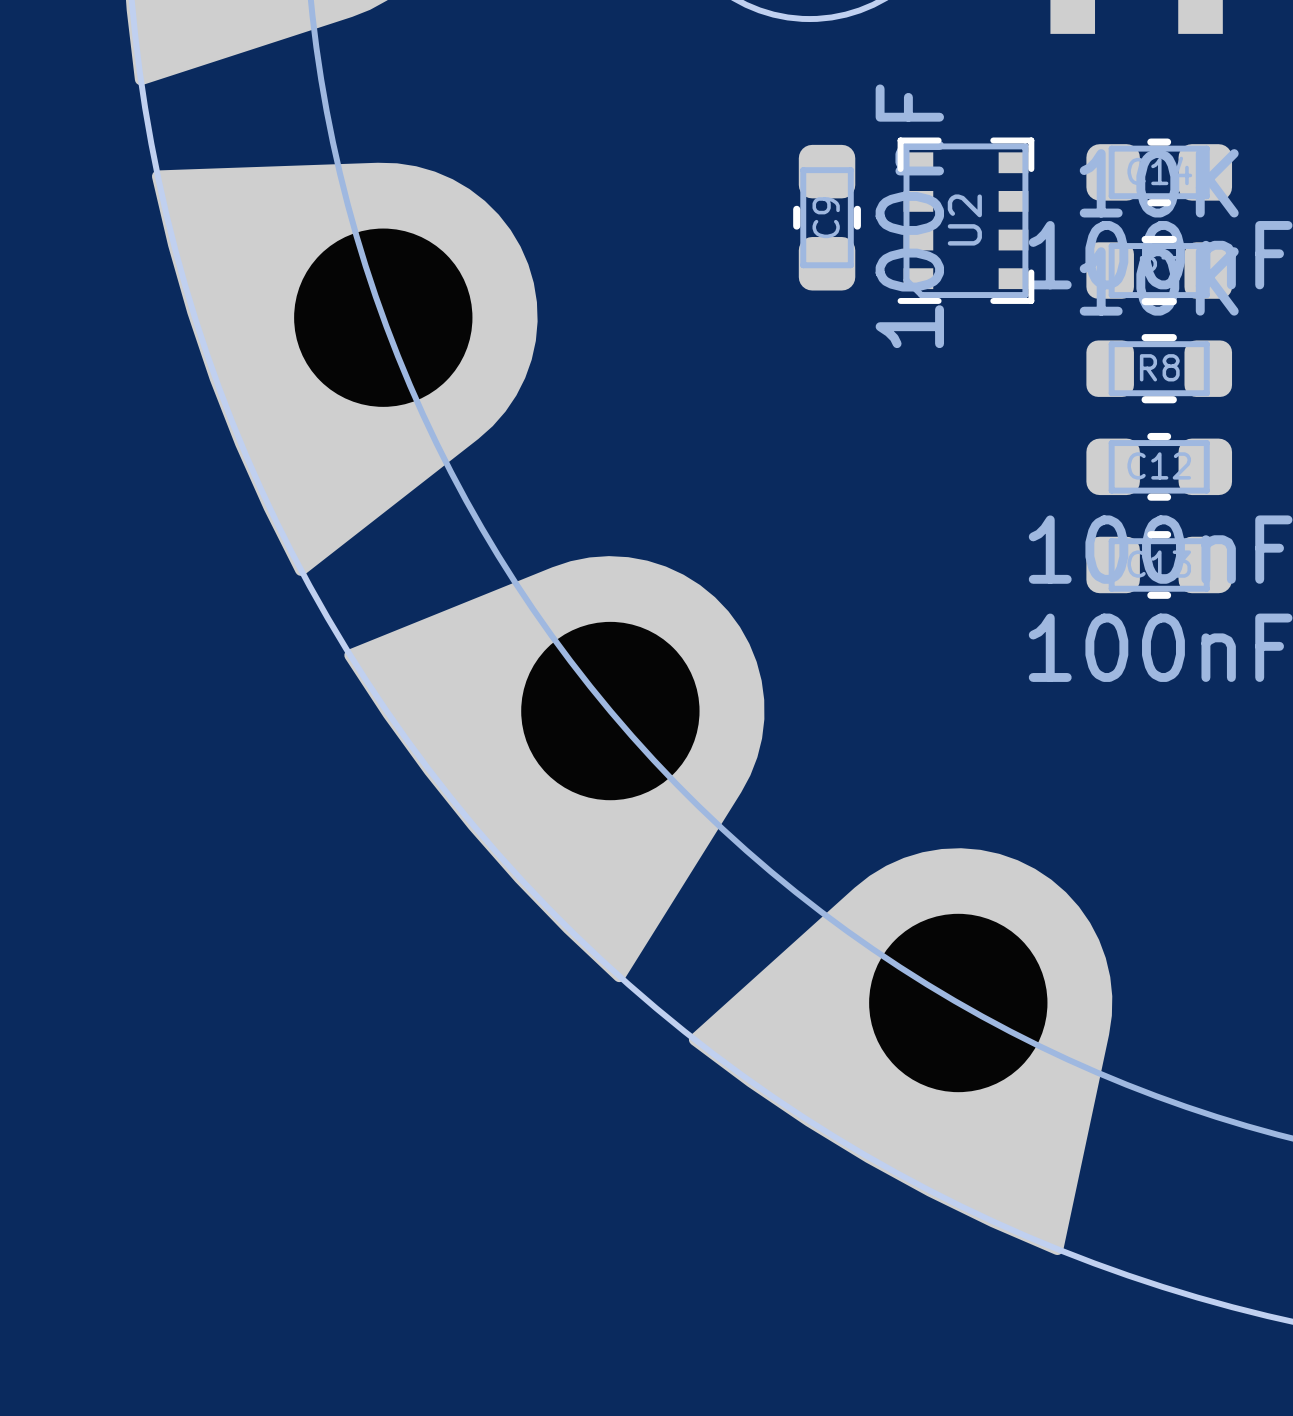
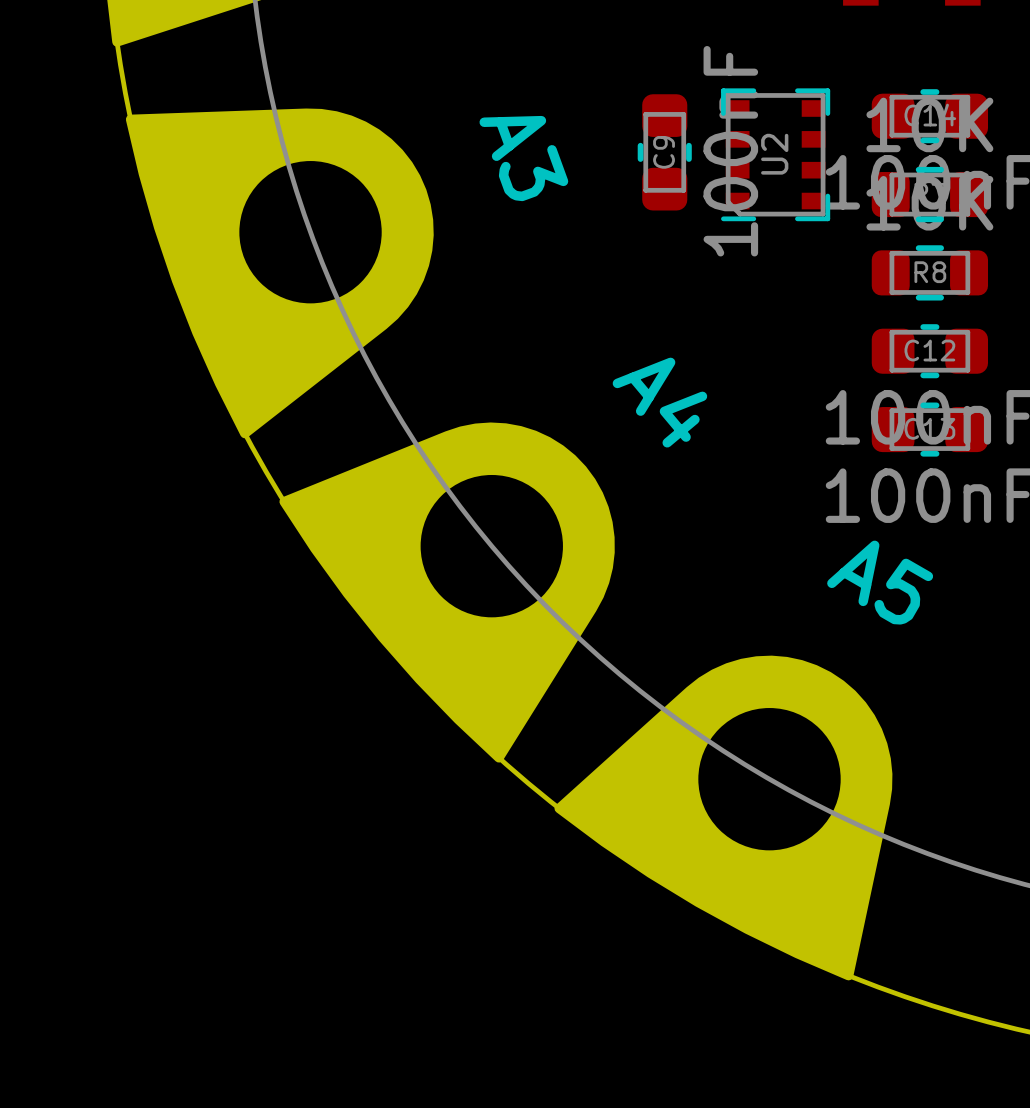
text: none -> A3 (523, 158)
text: none -> A4 (659, 402)
text: none -> A5 (880, 582)

